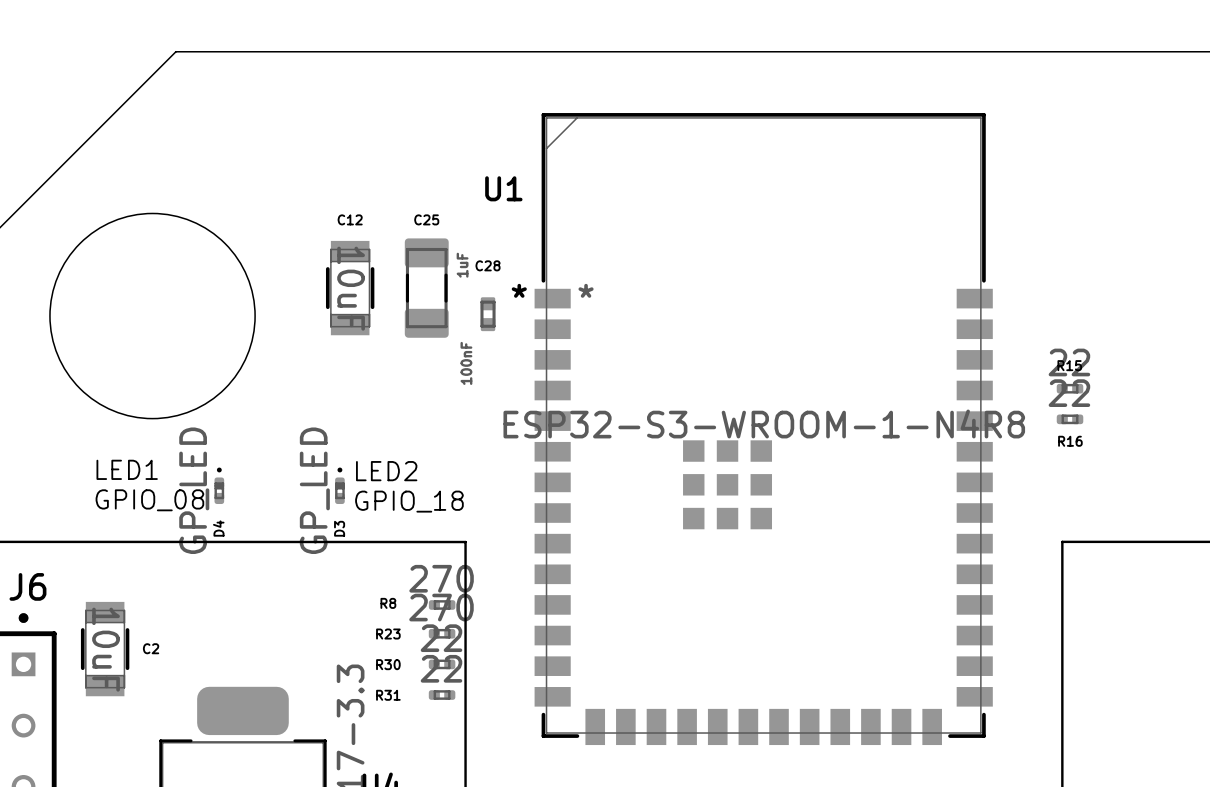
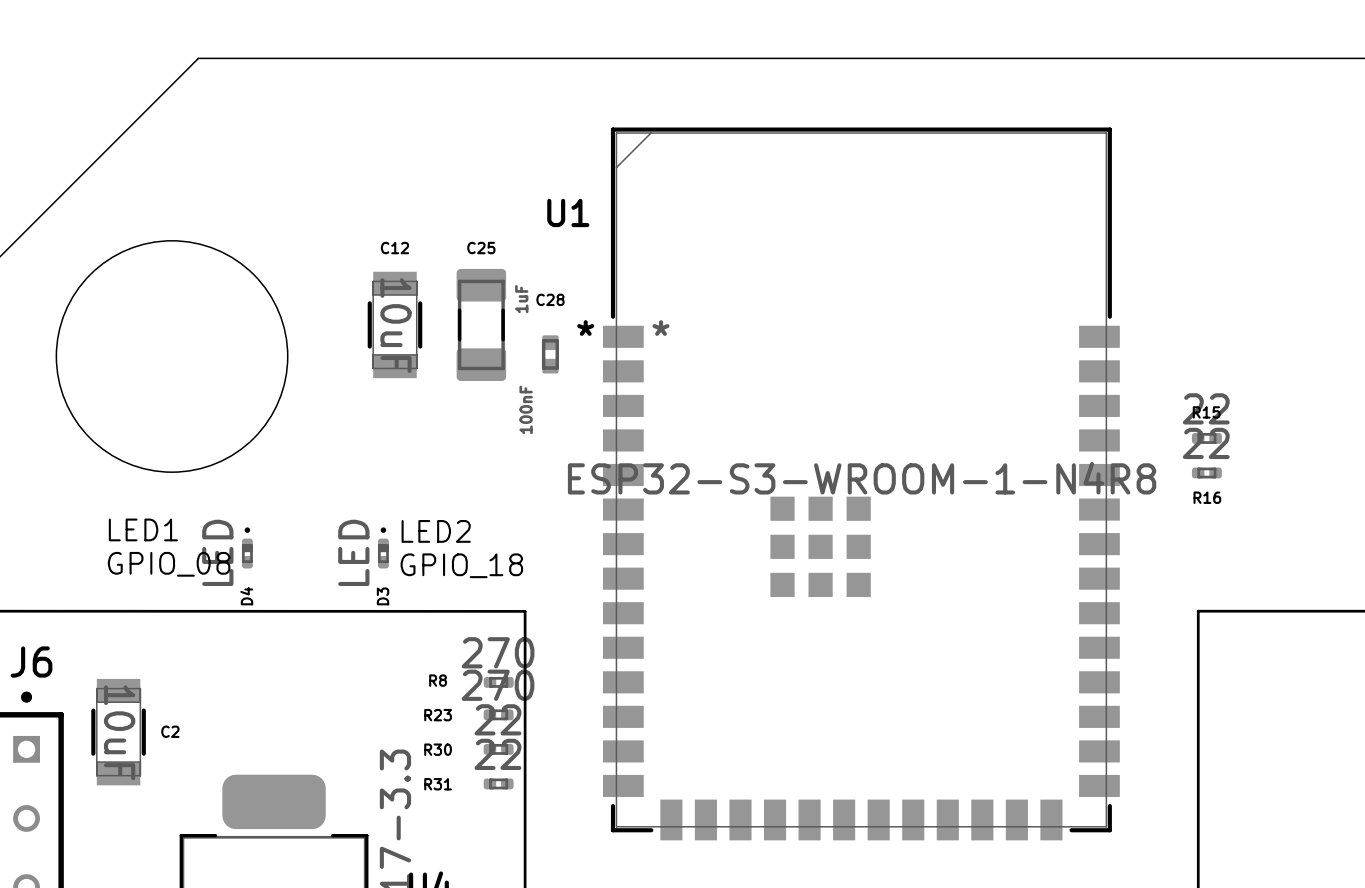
D4 value: GP_LED (194, 490) -> LED (217, 552)
D3 value: GP_LED (314, 490) -> LED (353, 552)

